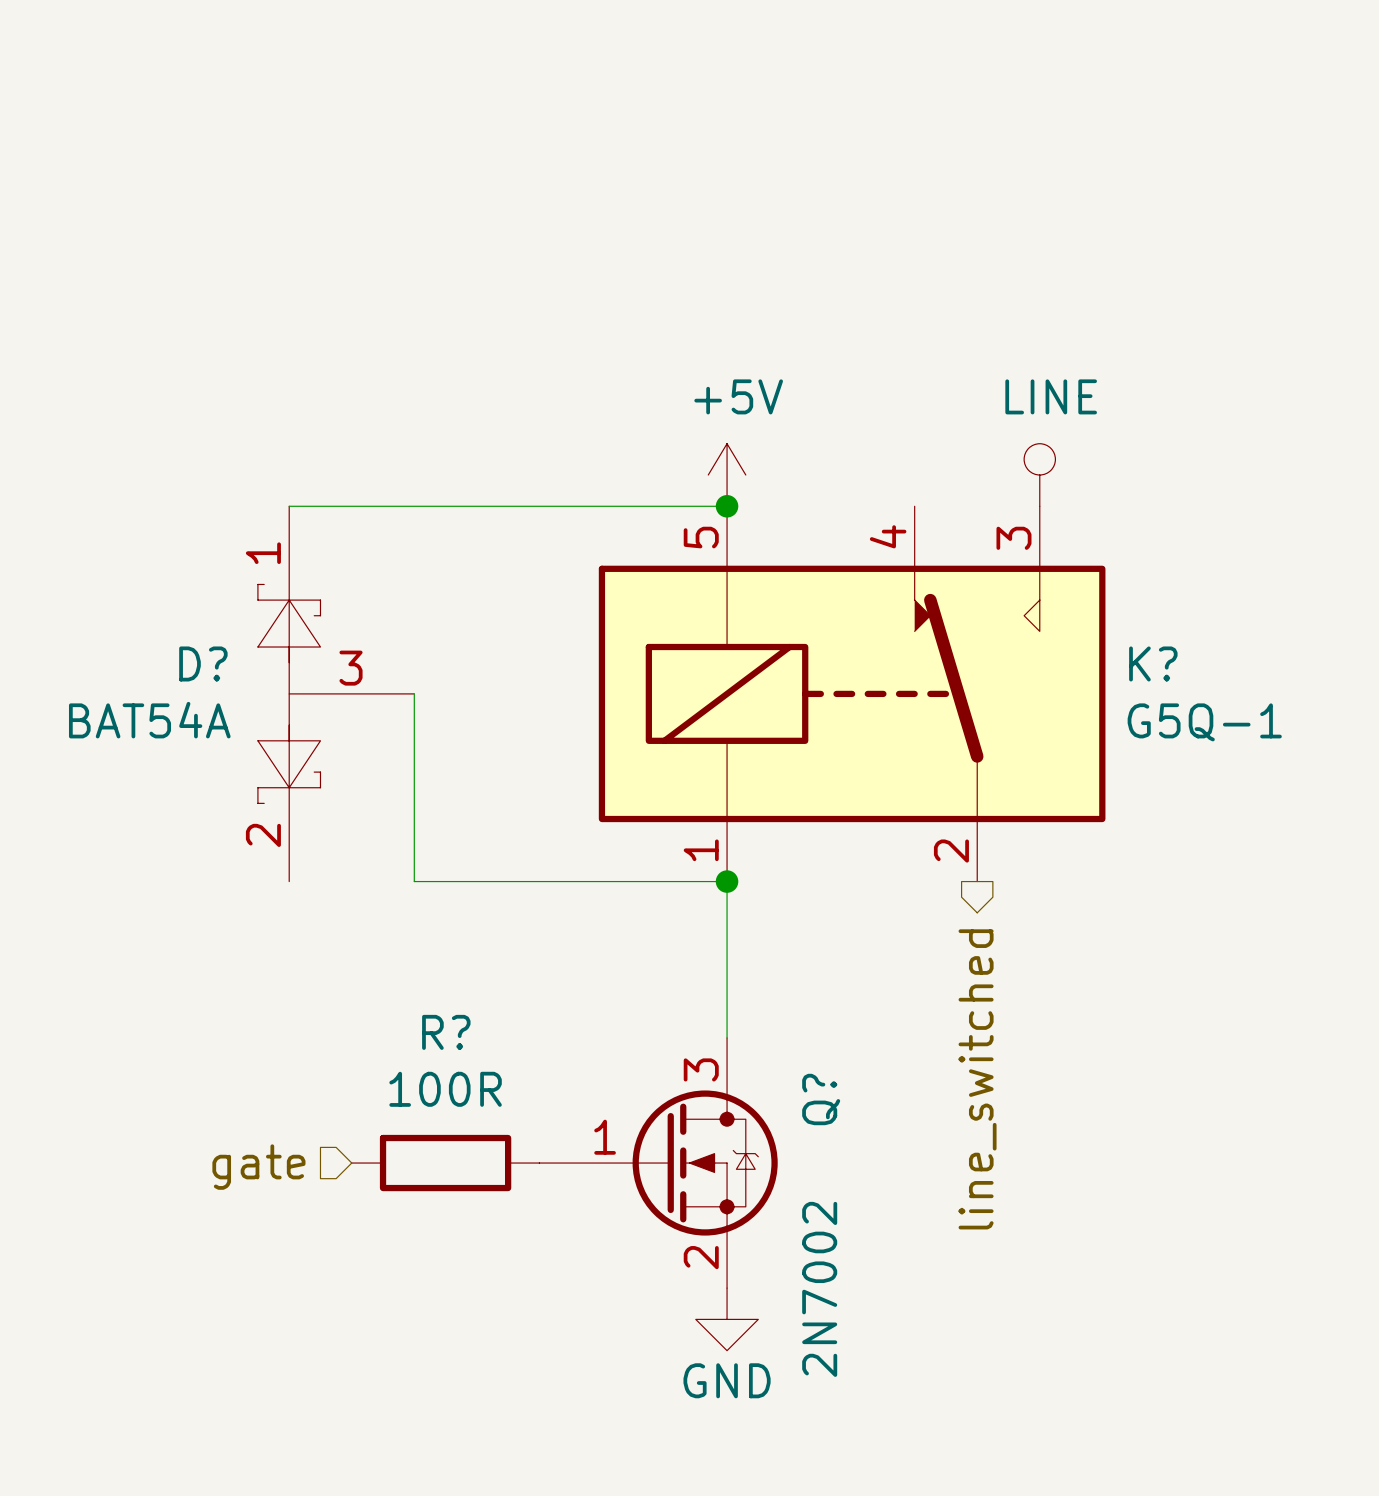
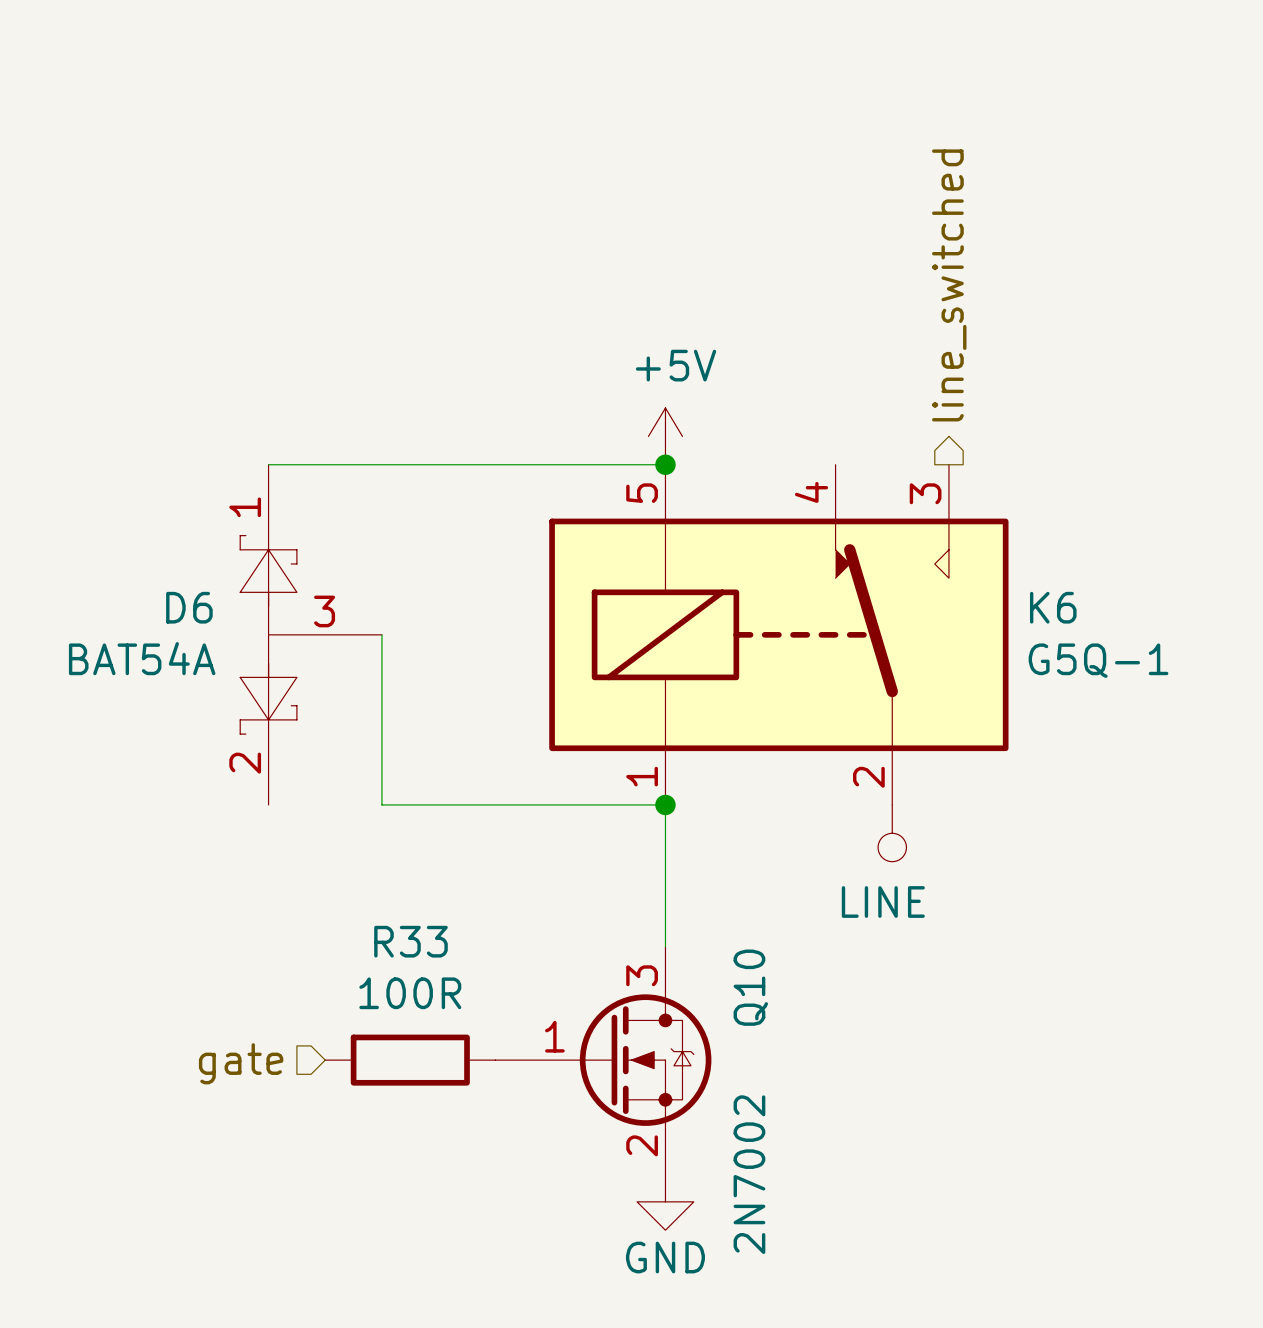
power symbol rotation: 0° (1039, 475) -> 180° (892, 833)
power symbol position: LINE (1039, 475) -> LINE (892, 833)
D? name: D? (203, 663) -> D6 (189, 607)
K? name: K? (1153, 663) -> K6 (1053, 607)
R? name: R? (446, 1032) -> R33 (410, 941)
hierarchical label rotation: 0° (977, 1079) -> 180° (949, 285)
hierarchical label position: line_switched (977, 1079) -> line_switched (949, 285)
Q? name: Q? (821, 1099) -> Q10 (750, 987)

